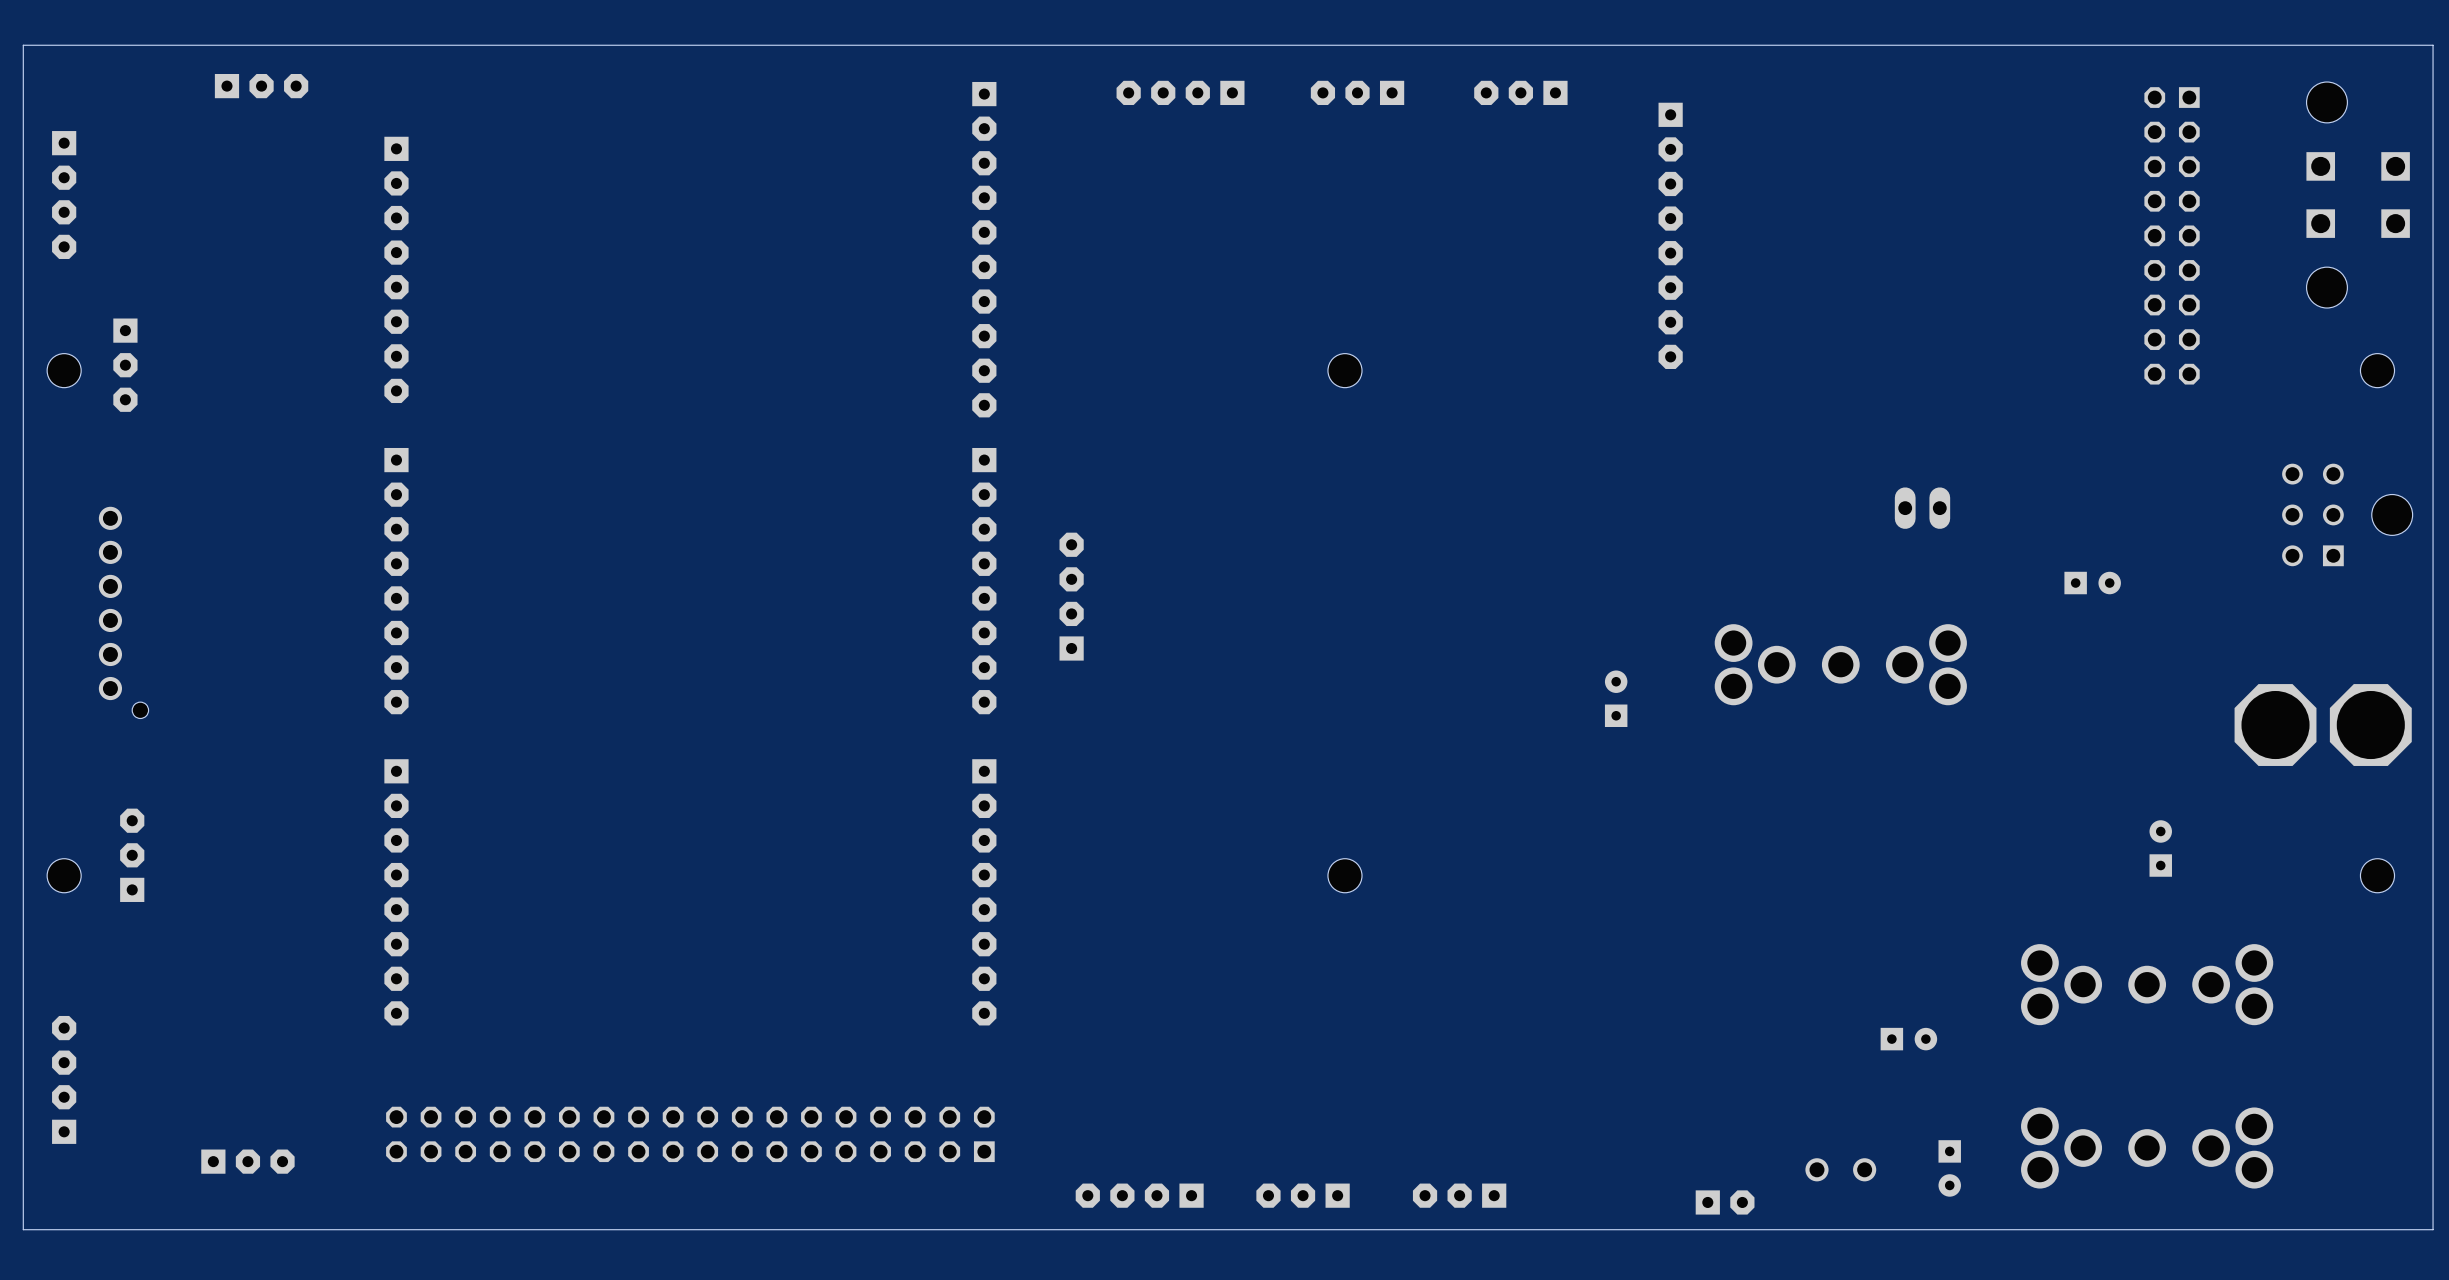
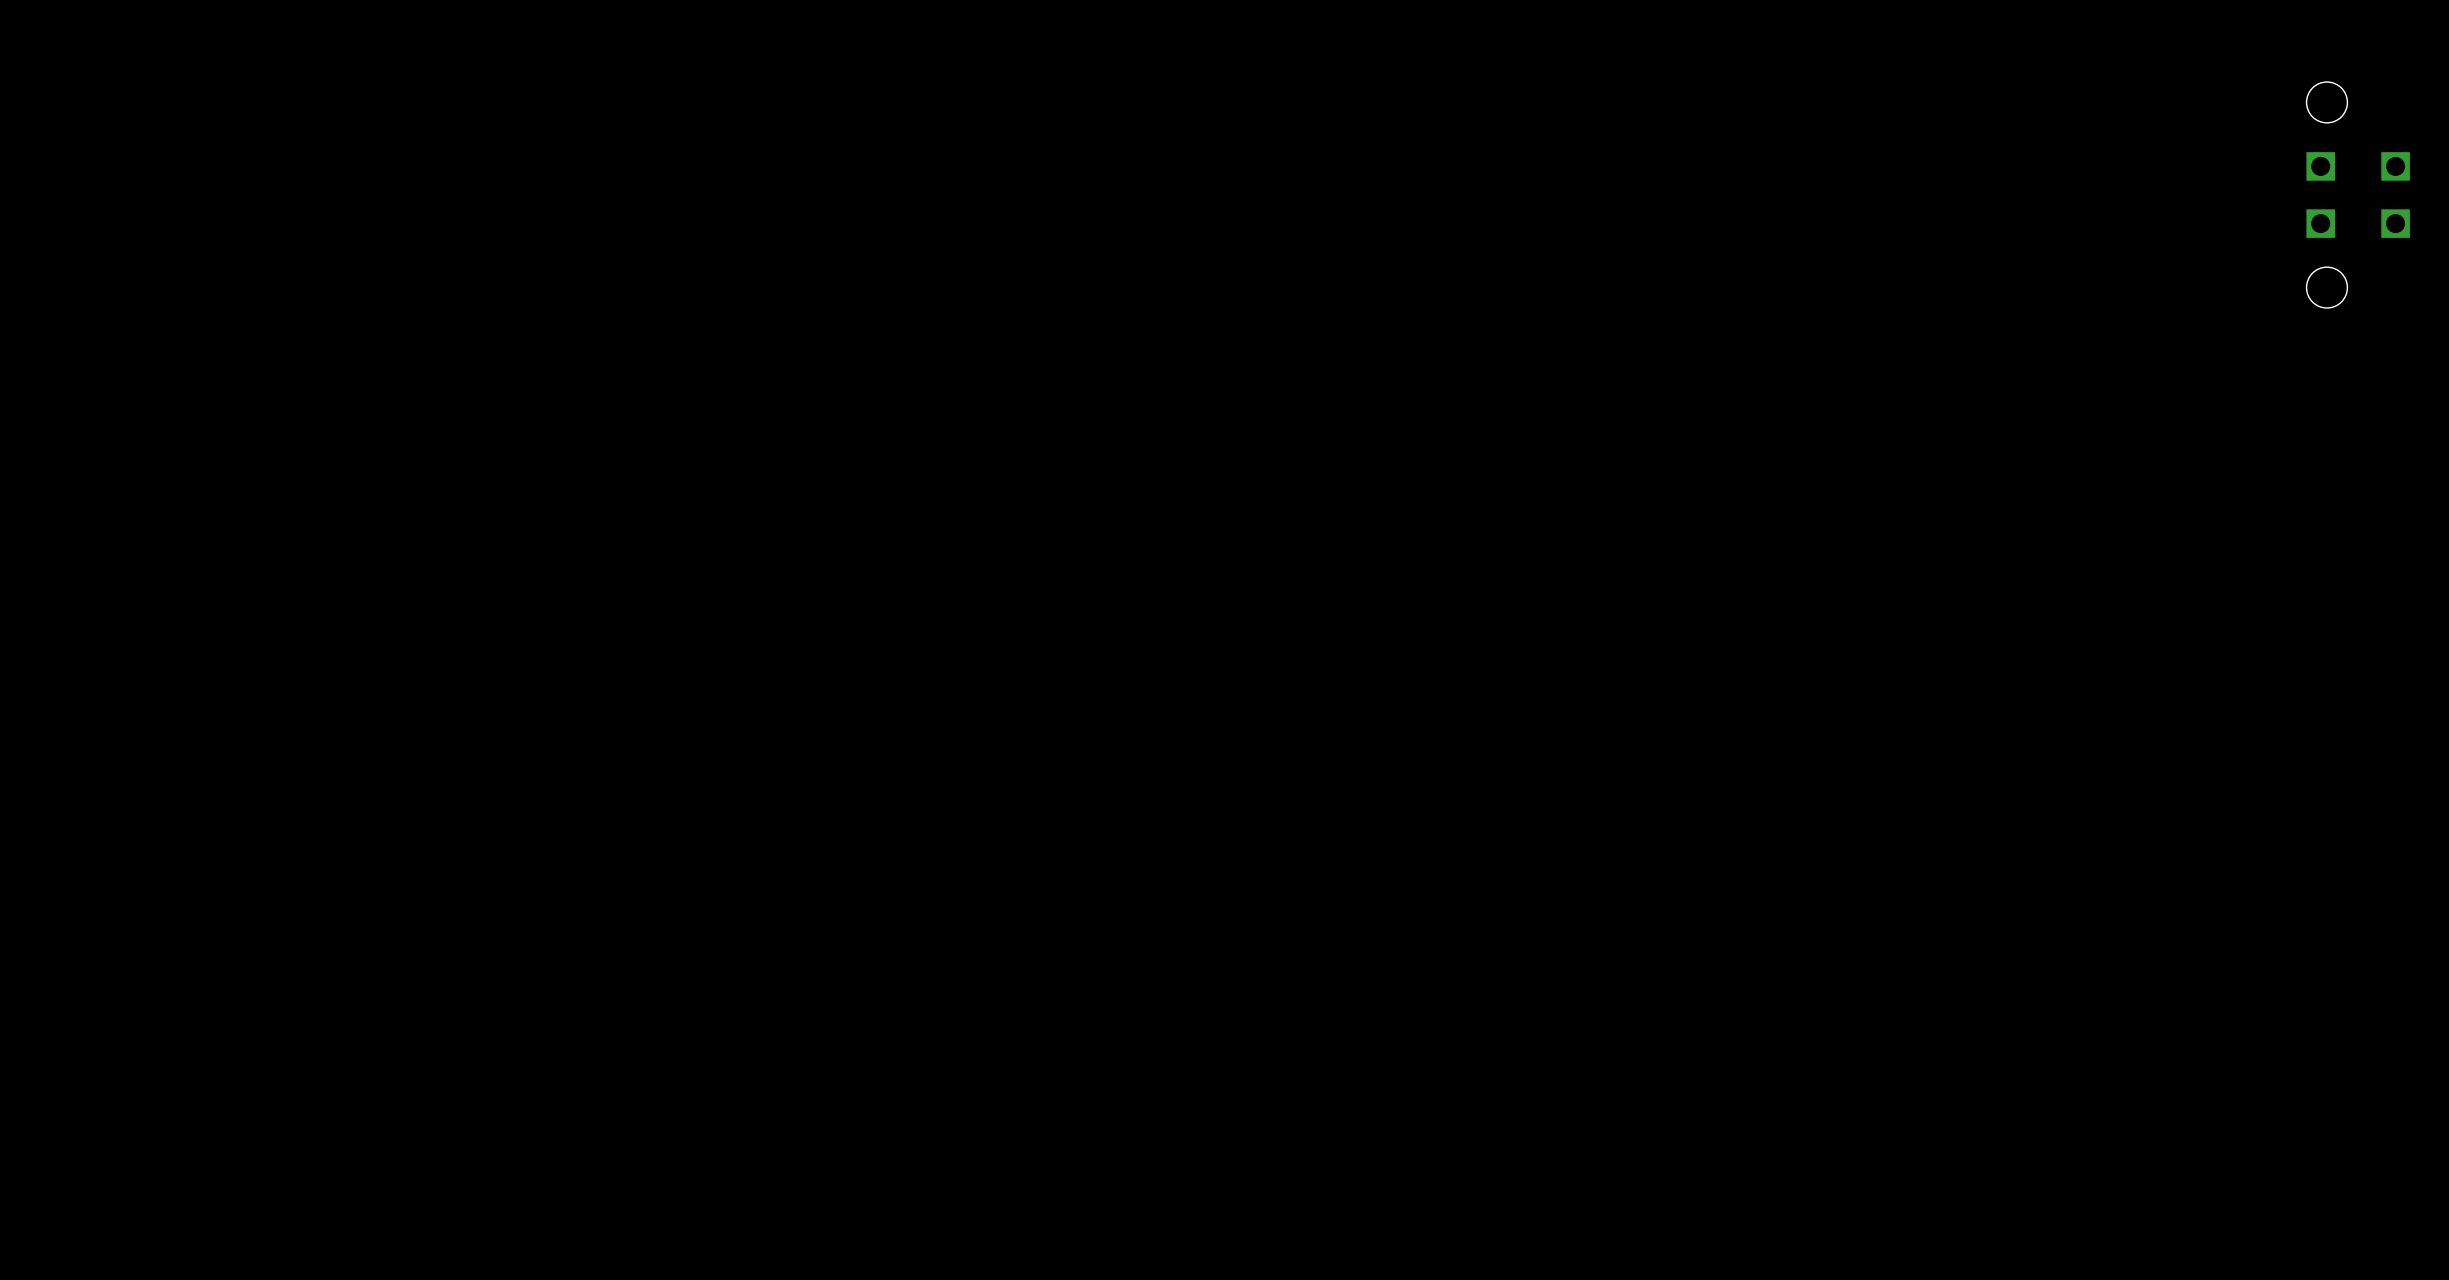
board edge: (2433, 45) (23, 45) (23, 1229) (2433, 1229) (2433, 45) -> none
part: (261, 86) -> none
part: (1180, 92) -> none
part: (1357, 92) -> none
part: (1520, 92) -> none
part: (64, 195) -> none
part: (1670, 235) -> none
part: (2172, 235) -> none
part: (984, 249) -> none
part: (396, 269) -> none
part: (125, 365) -> none
hole: (64, 370) -> none
hole: (1344, 370) -> none
hole: (2377, 370) -> none
part: (1922, 508) -> none
part: (2347, 514) -> none
part: (396, 581) -> none
part: (984, 581) -> none
part: (2092, 583) -> none
part: (1071, 596) -> none
part: (123, 612) -> none
part: (1840, 664) -> none
part: (1616, 698) -> none
part: (2323, 725) -> none
part: (2160, 848) -> none
part: (132, 855) -> none
hole: (64, 875) -> none
hole: (1344, 875) -> none
hole: (2377, 875) -> none
part: (396, 892) -> none
part: (984, 892) -> none
part: (2147, 984) -> none
part: (1908, 1039) -> none
part: (64, 1079) -> none
part: (690, 1134) -> none
part: (2147, 1148) -> none
part: (247, 1161) -> none
part: (1949, 1168) -> none
part: (1840, 1169) -> none
part: (1139, 1195) -> none
part: (1303, 1195) -> none
part: (1459, 1195) -> none
part: (1725, 1202) -> none

